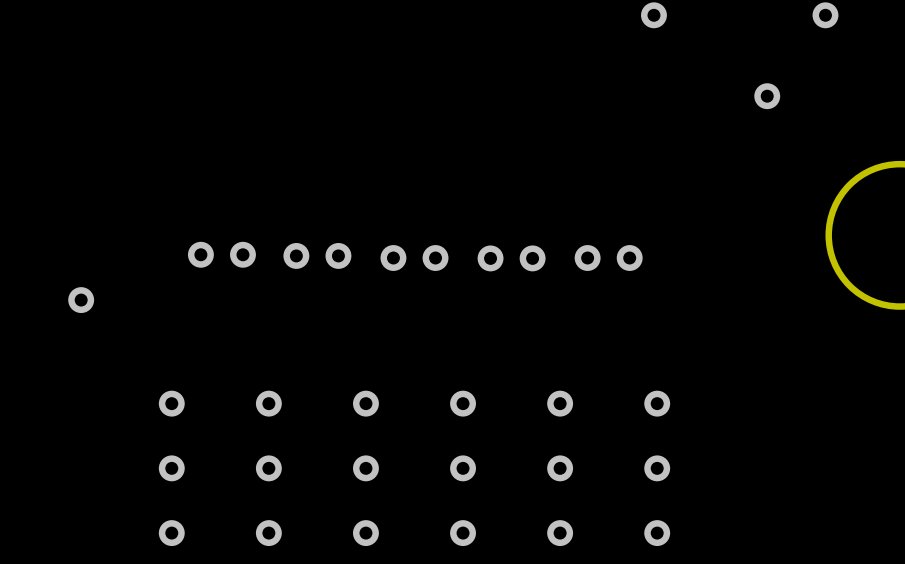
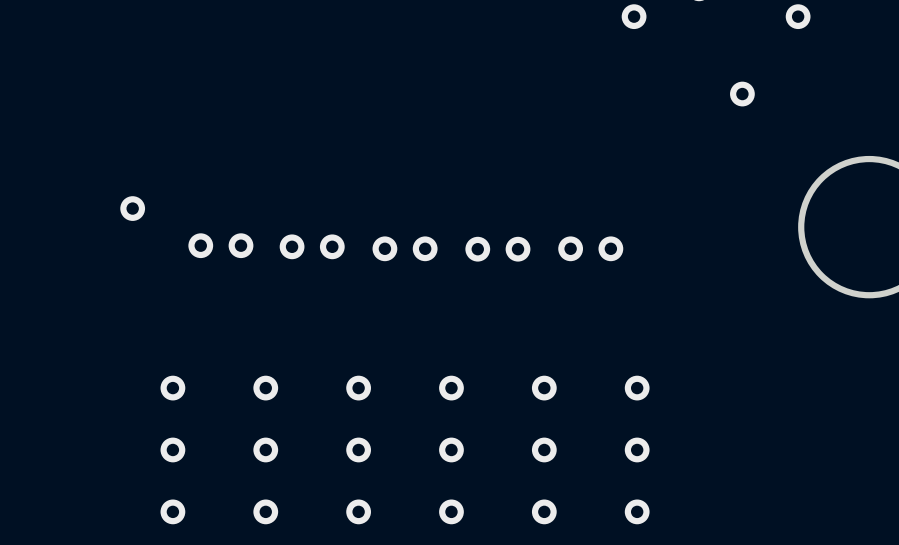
via position: (81, 300) -> (132, 208)

